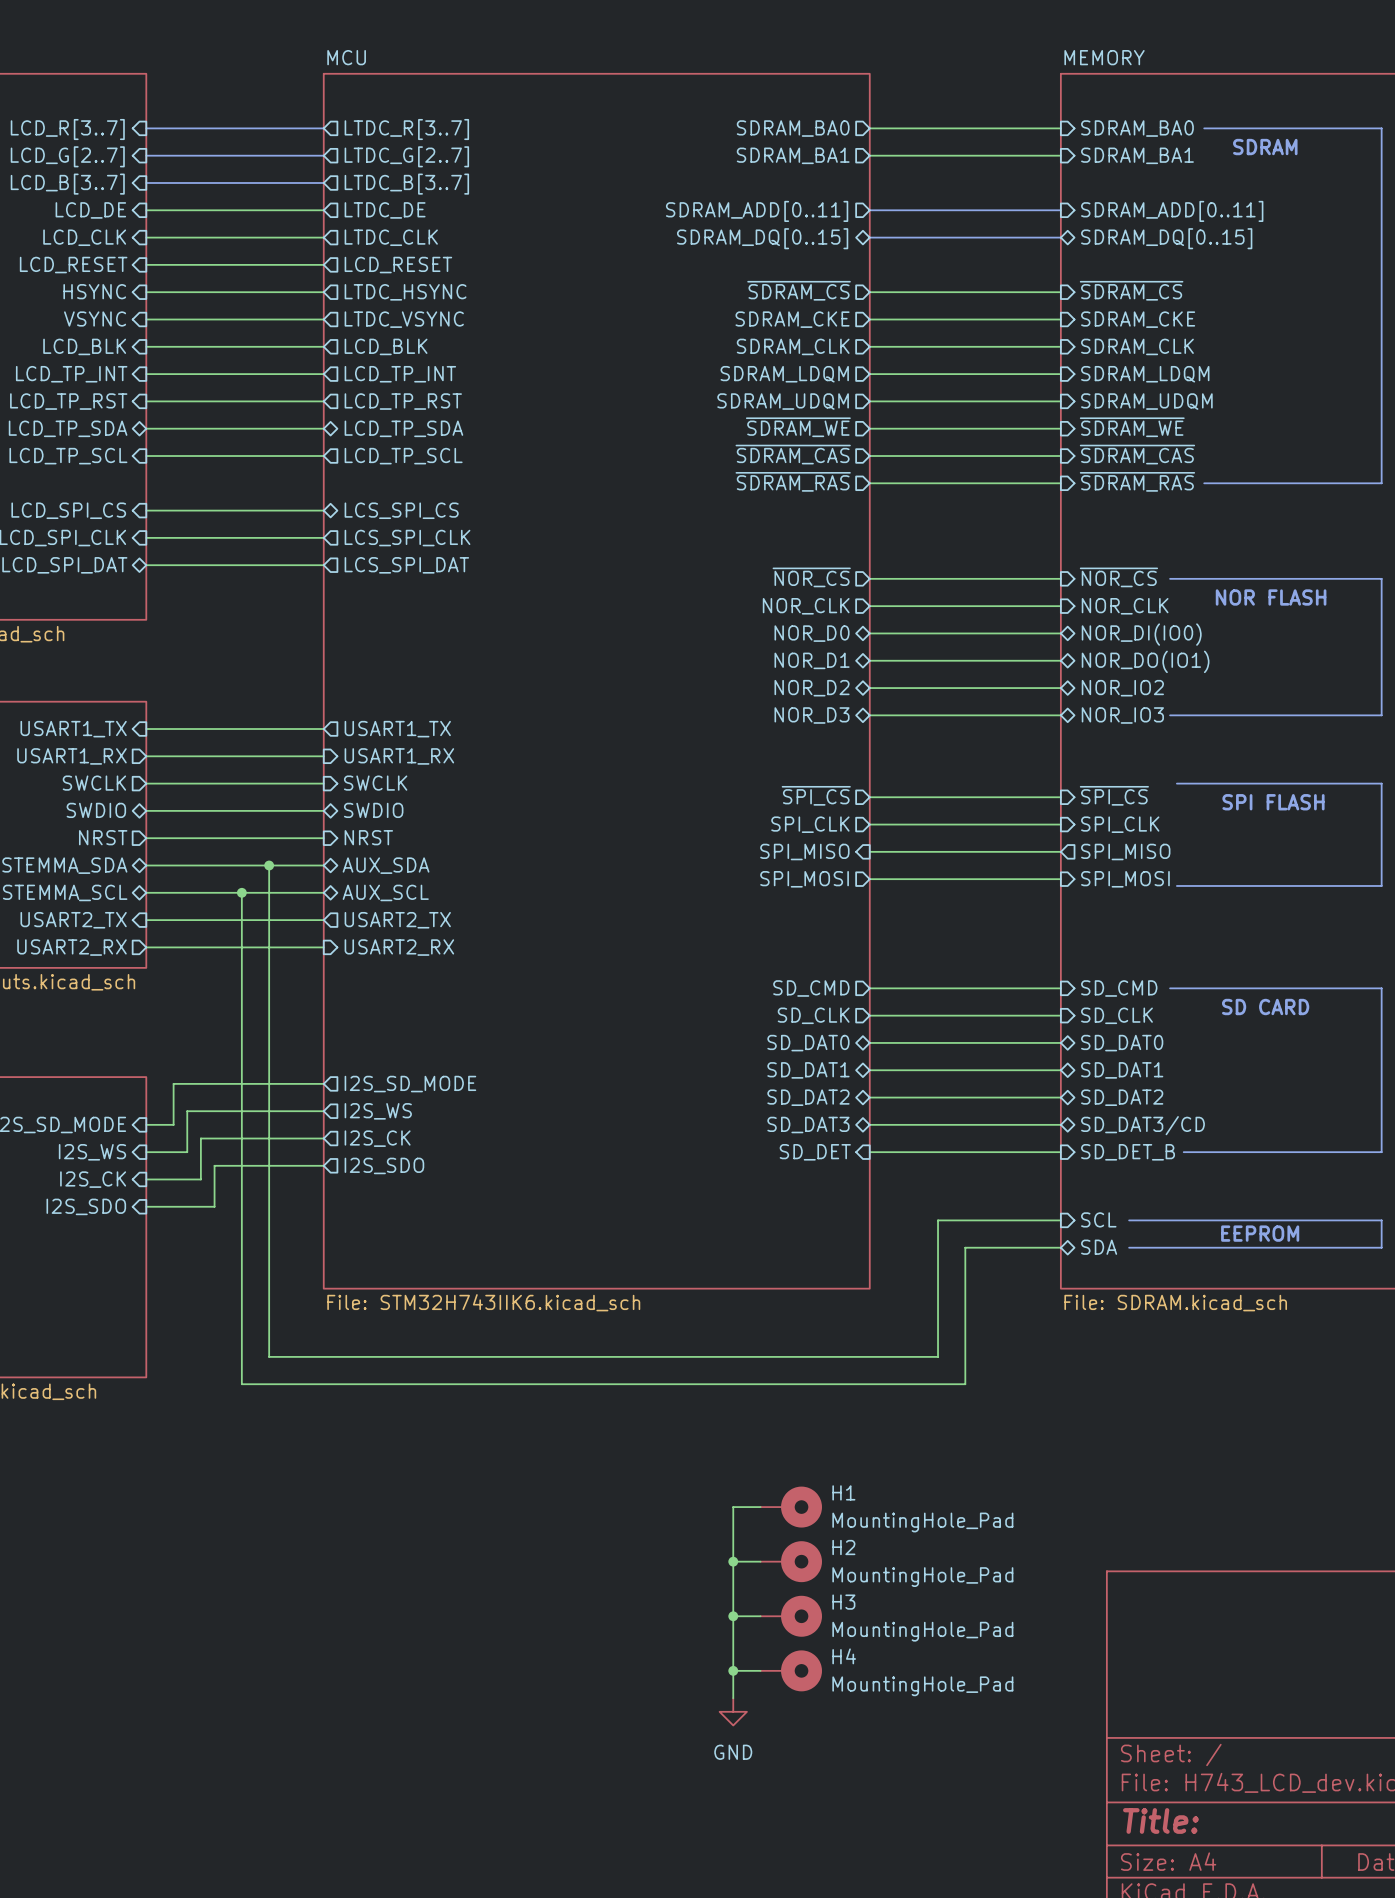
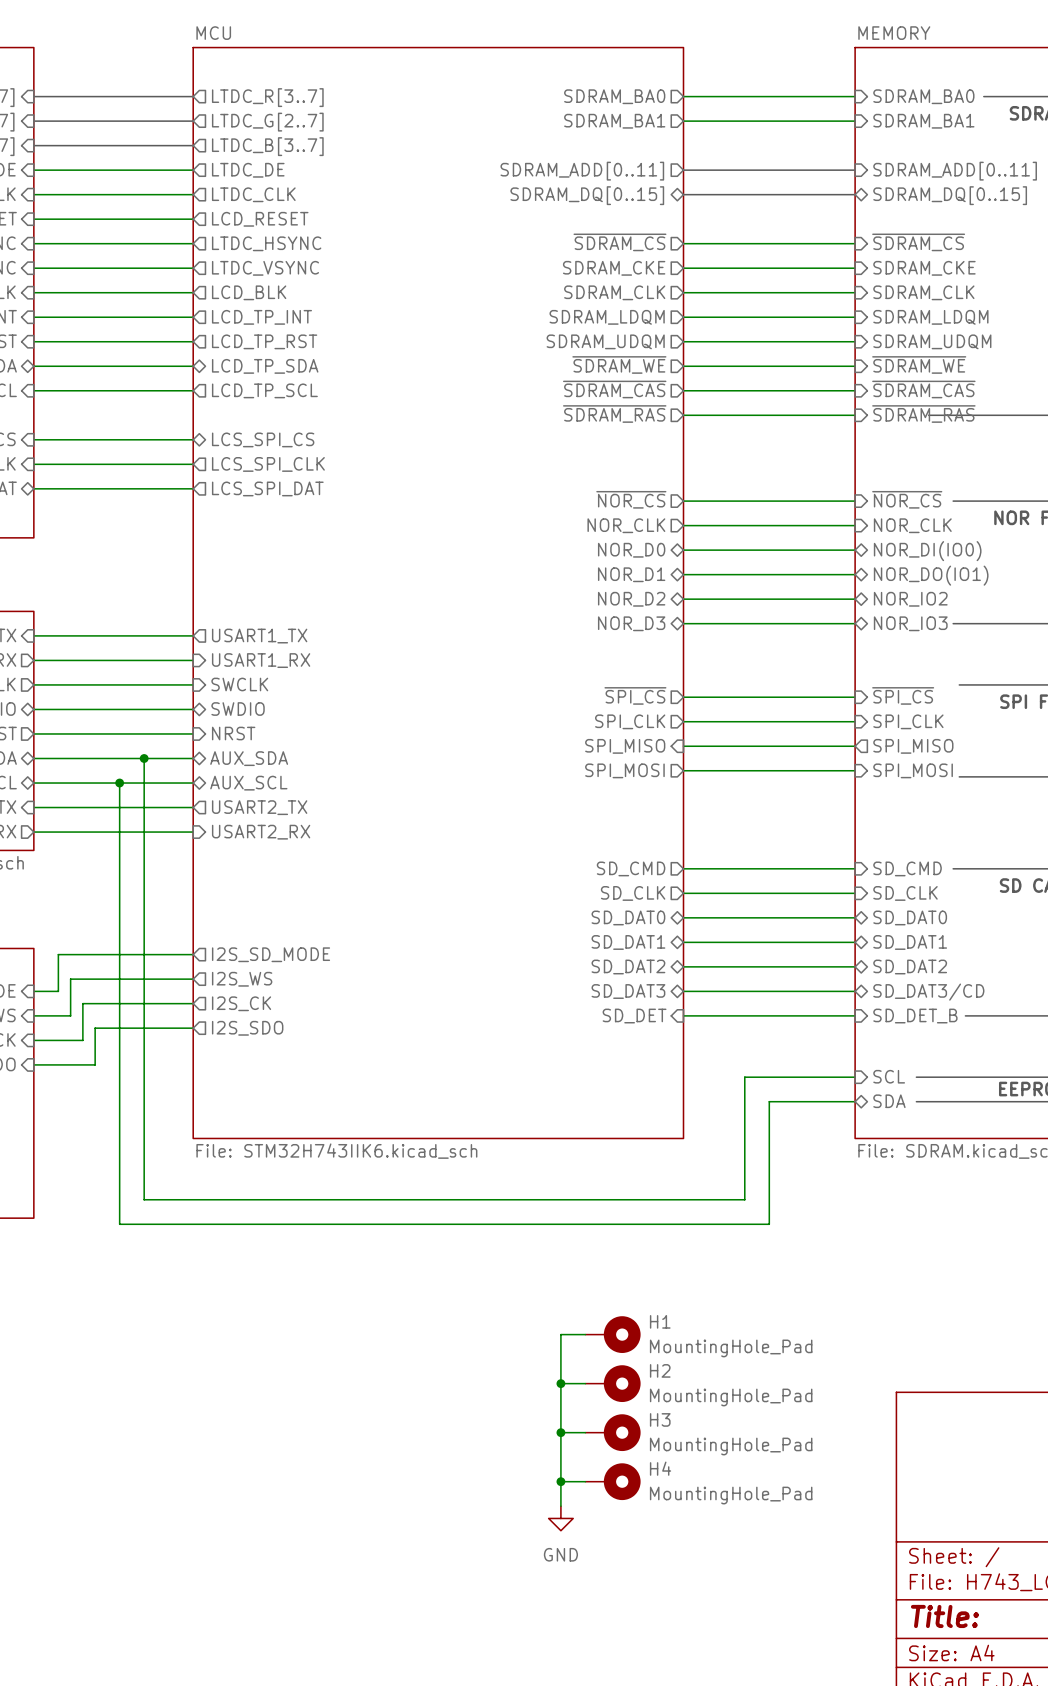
line: none -> (928, 415) (983, 415)

